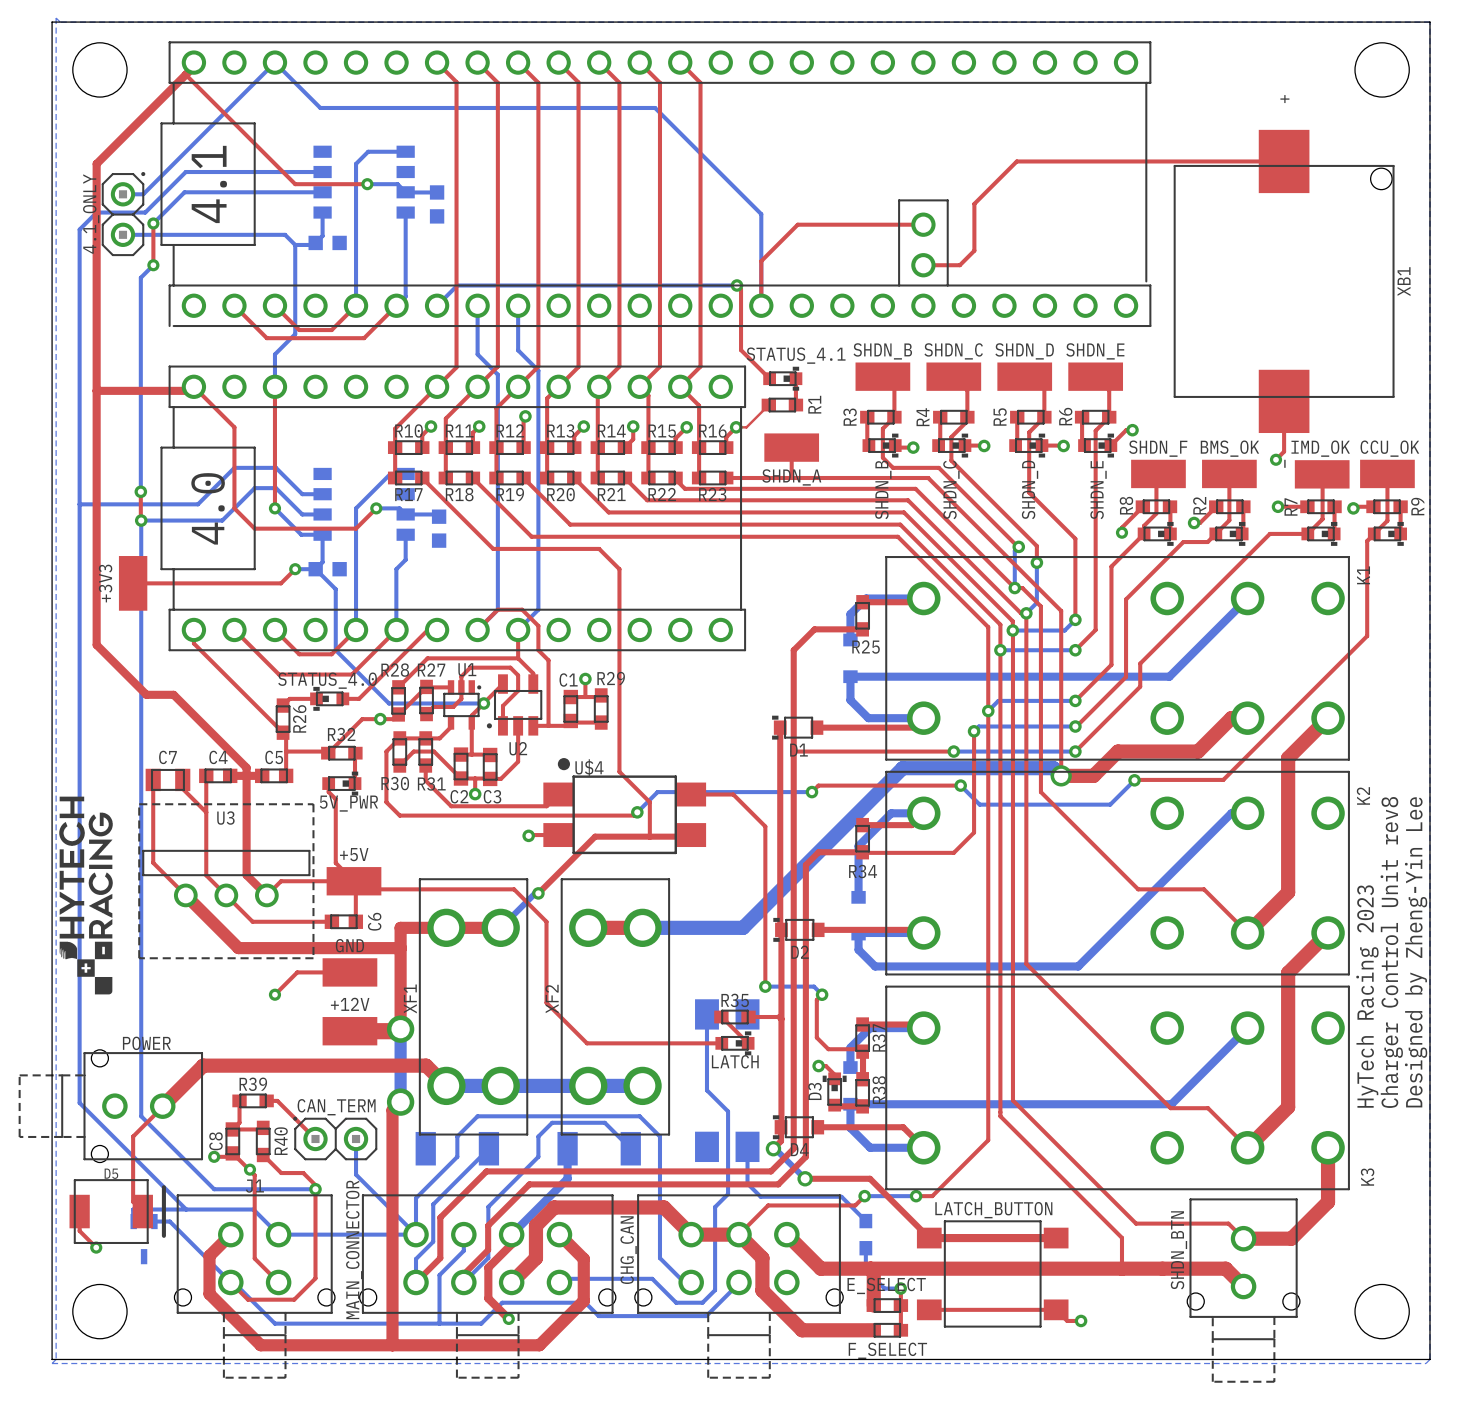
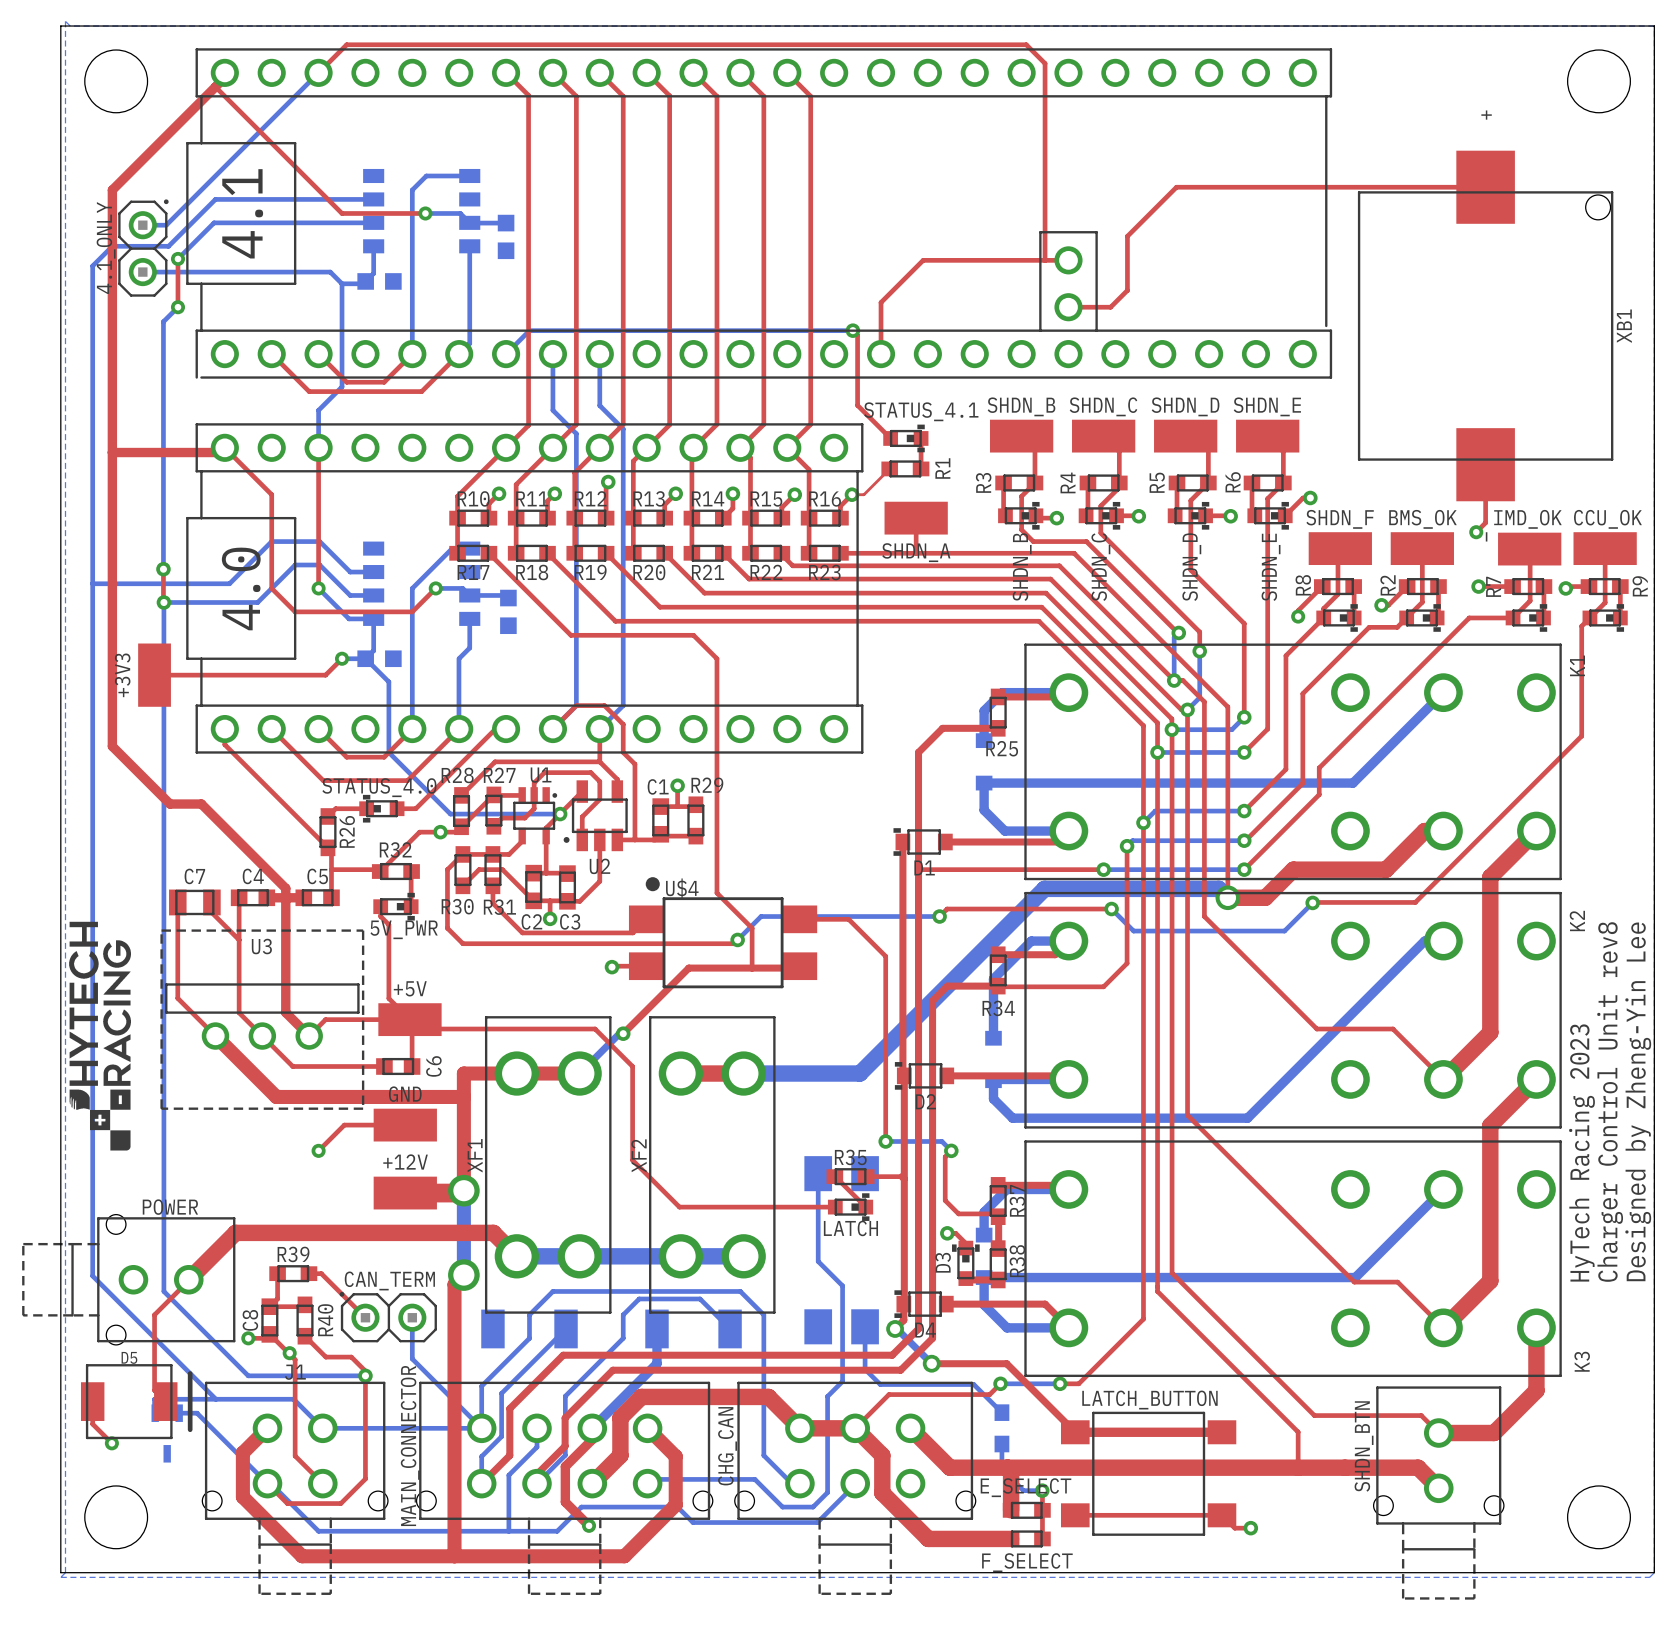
top track: none -> (318, 72) (346, 44) (1026, 44) (1045, 63) (1045, 260)
bottom track: (274, 62) (320, 107) (655, 107) (761, 214) (761, 305) -> none

